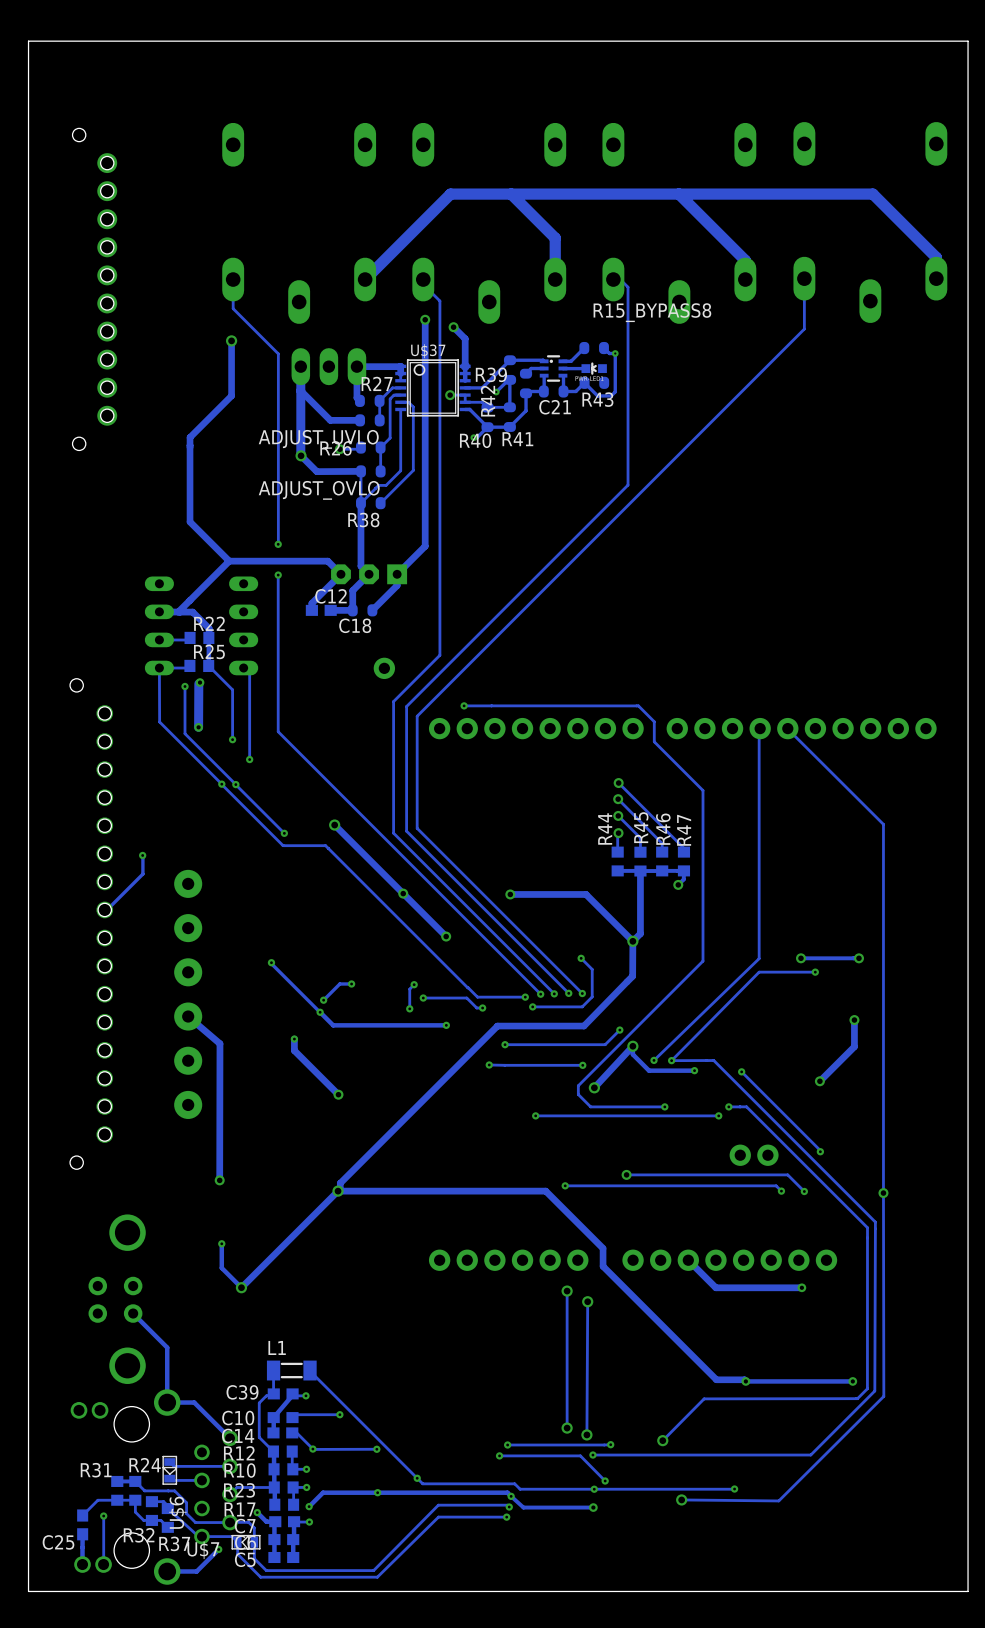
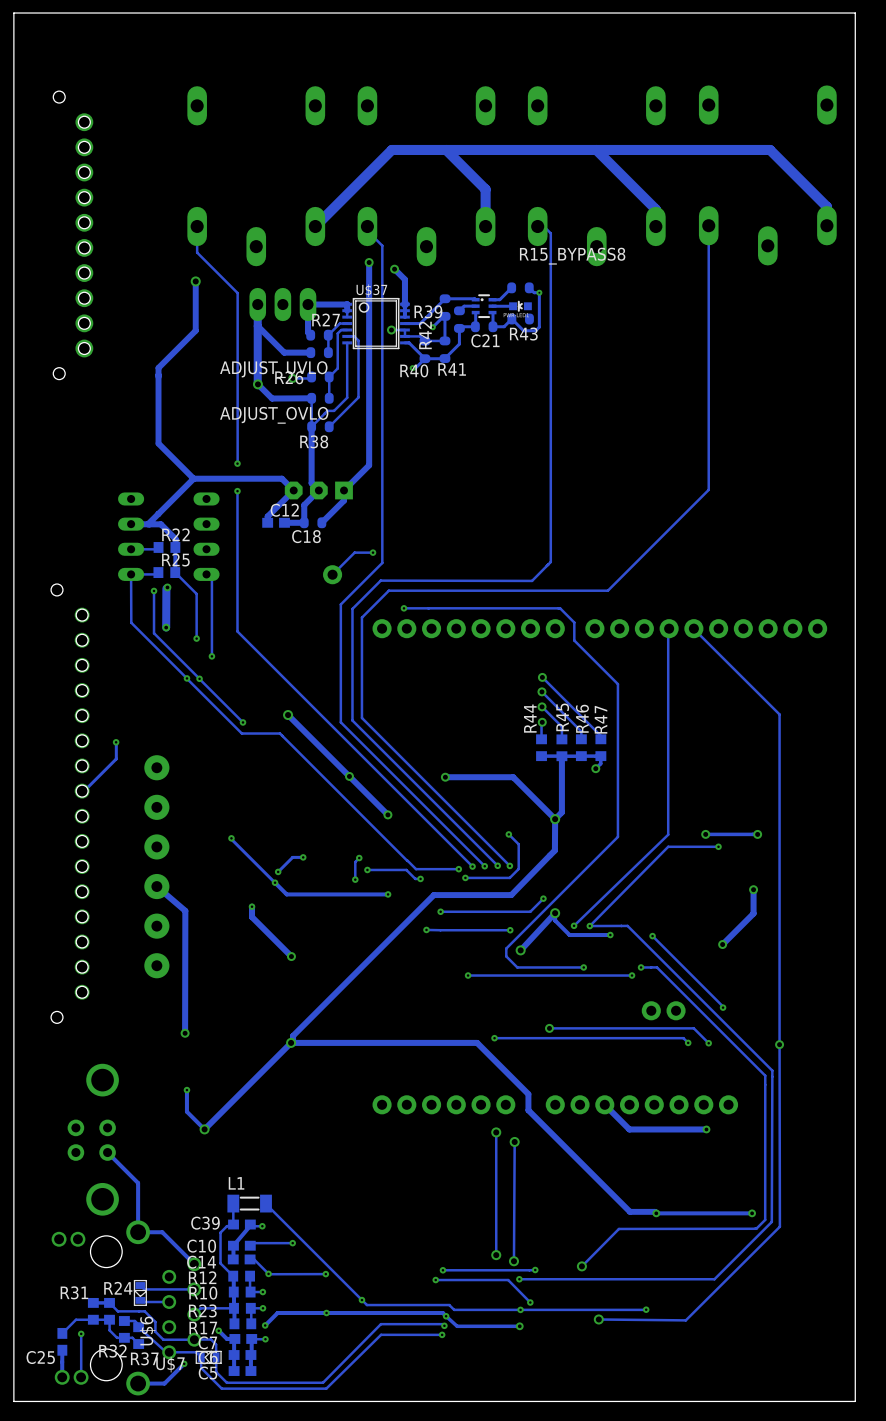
track: (804, 329) (447, 686) -> (708, 270) (708, 489) (607, 590) (388, 590)
track: (628, 485) (438, 674) -> (548, 564) (532, 580) (380, 580)
track: none -> (550, 410) (550, 562) (546, 565)
track: none -> (373, 552) (354, 552) (332, 574)
via: none -> (373, 552)

